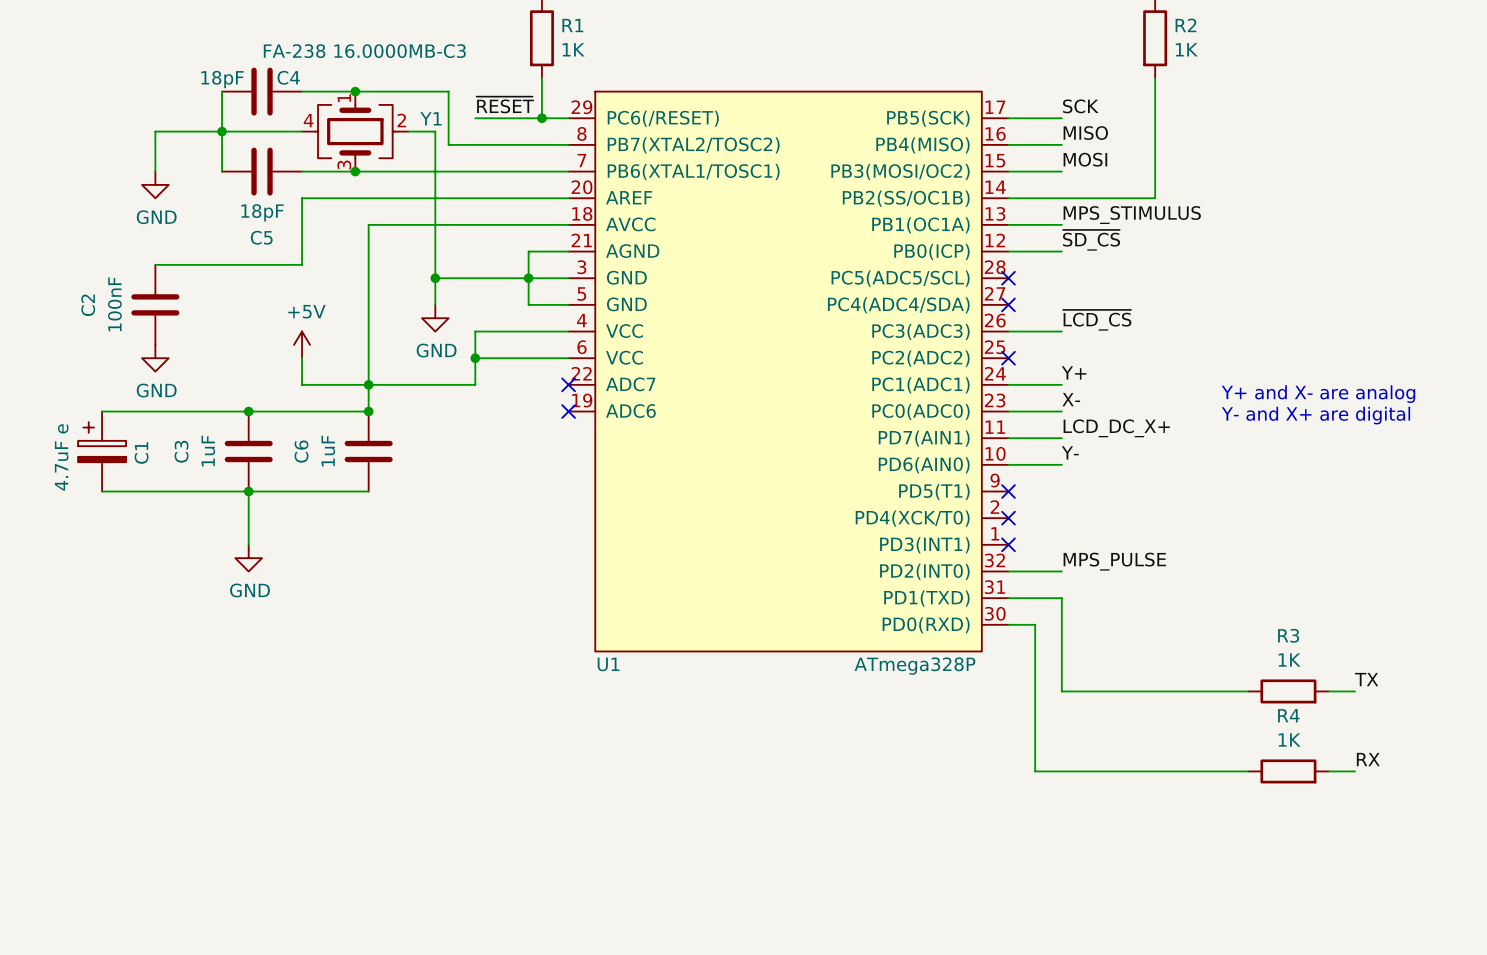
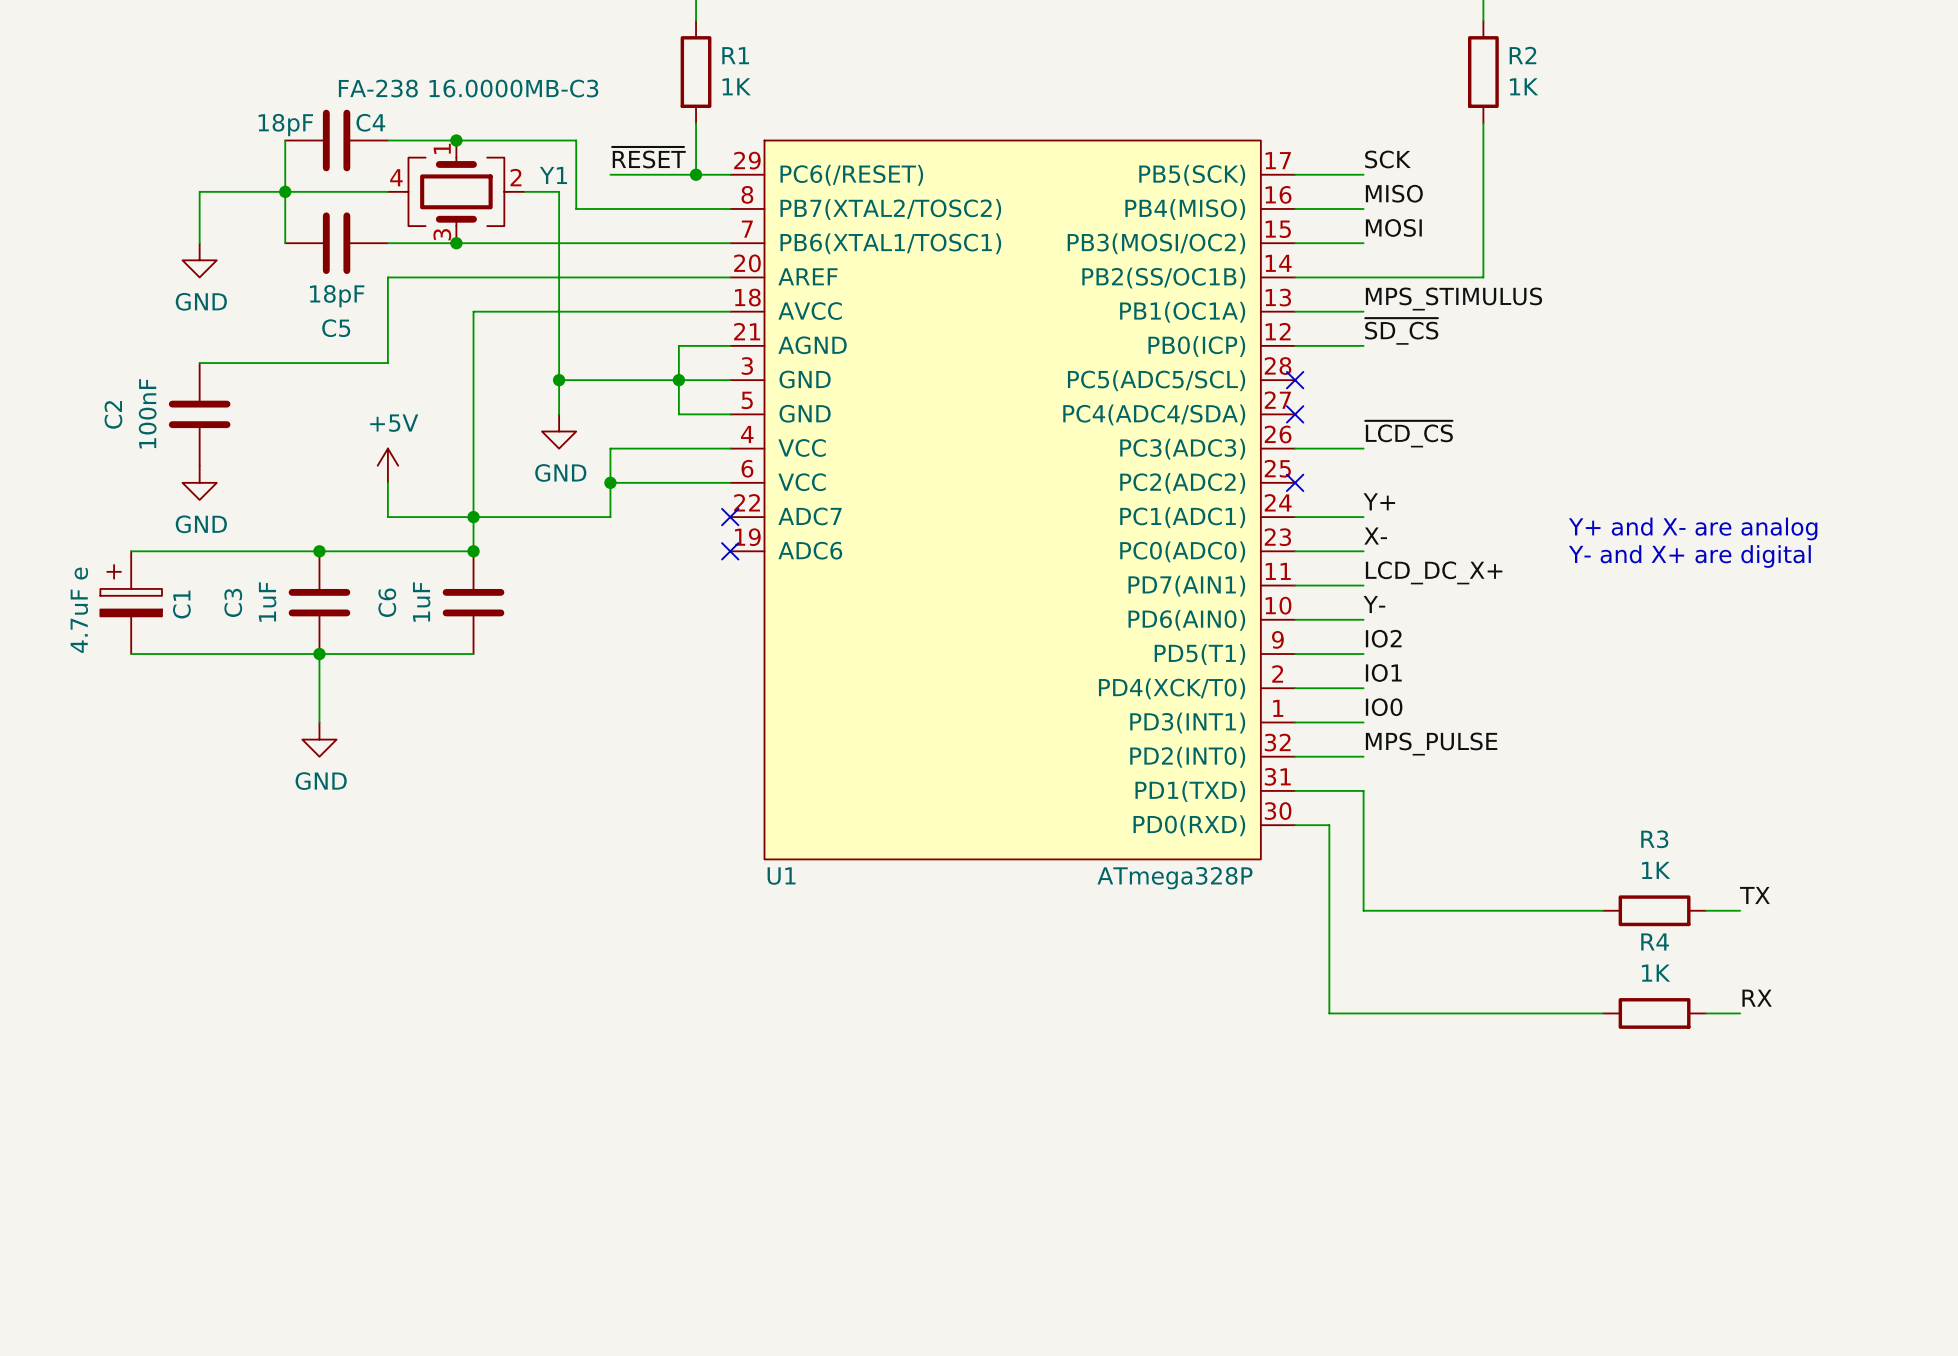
label: none -> IO2 (1383, 638)
wire: none -> (1295, 654) (1363, 654)
no-connect mark: (1008, 491) -> none
label: none -> IO1 (1383, 672)
wire: none -> (1295, 688) (1363, 688)
no-connect mark: (1008, 518) -> none
label: none -> IO0 (1384, 707)
wire: none -> (1295, 722) (1363, 722)
no-connect mark: (1008, 544) -> none

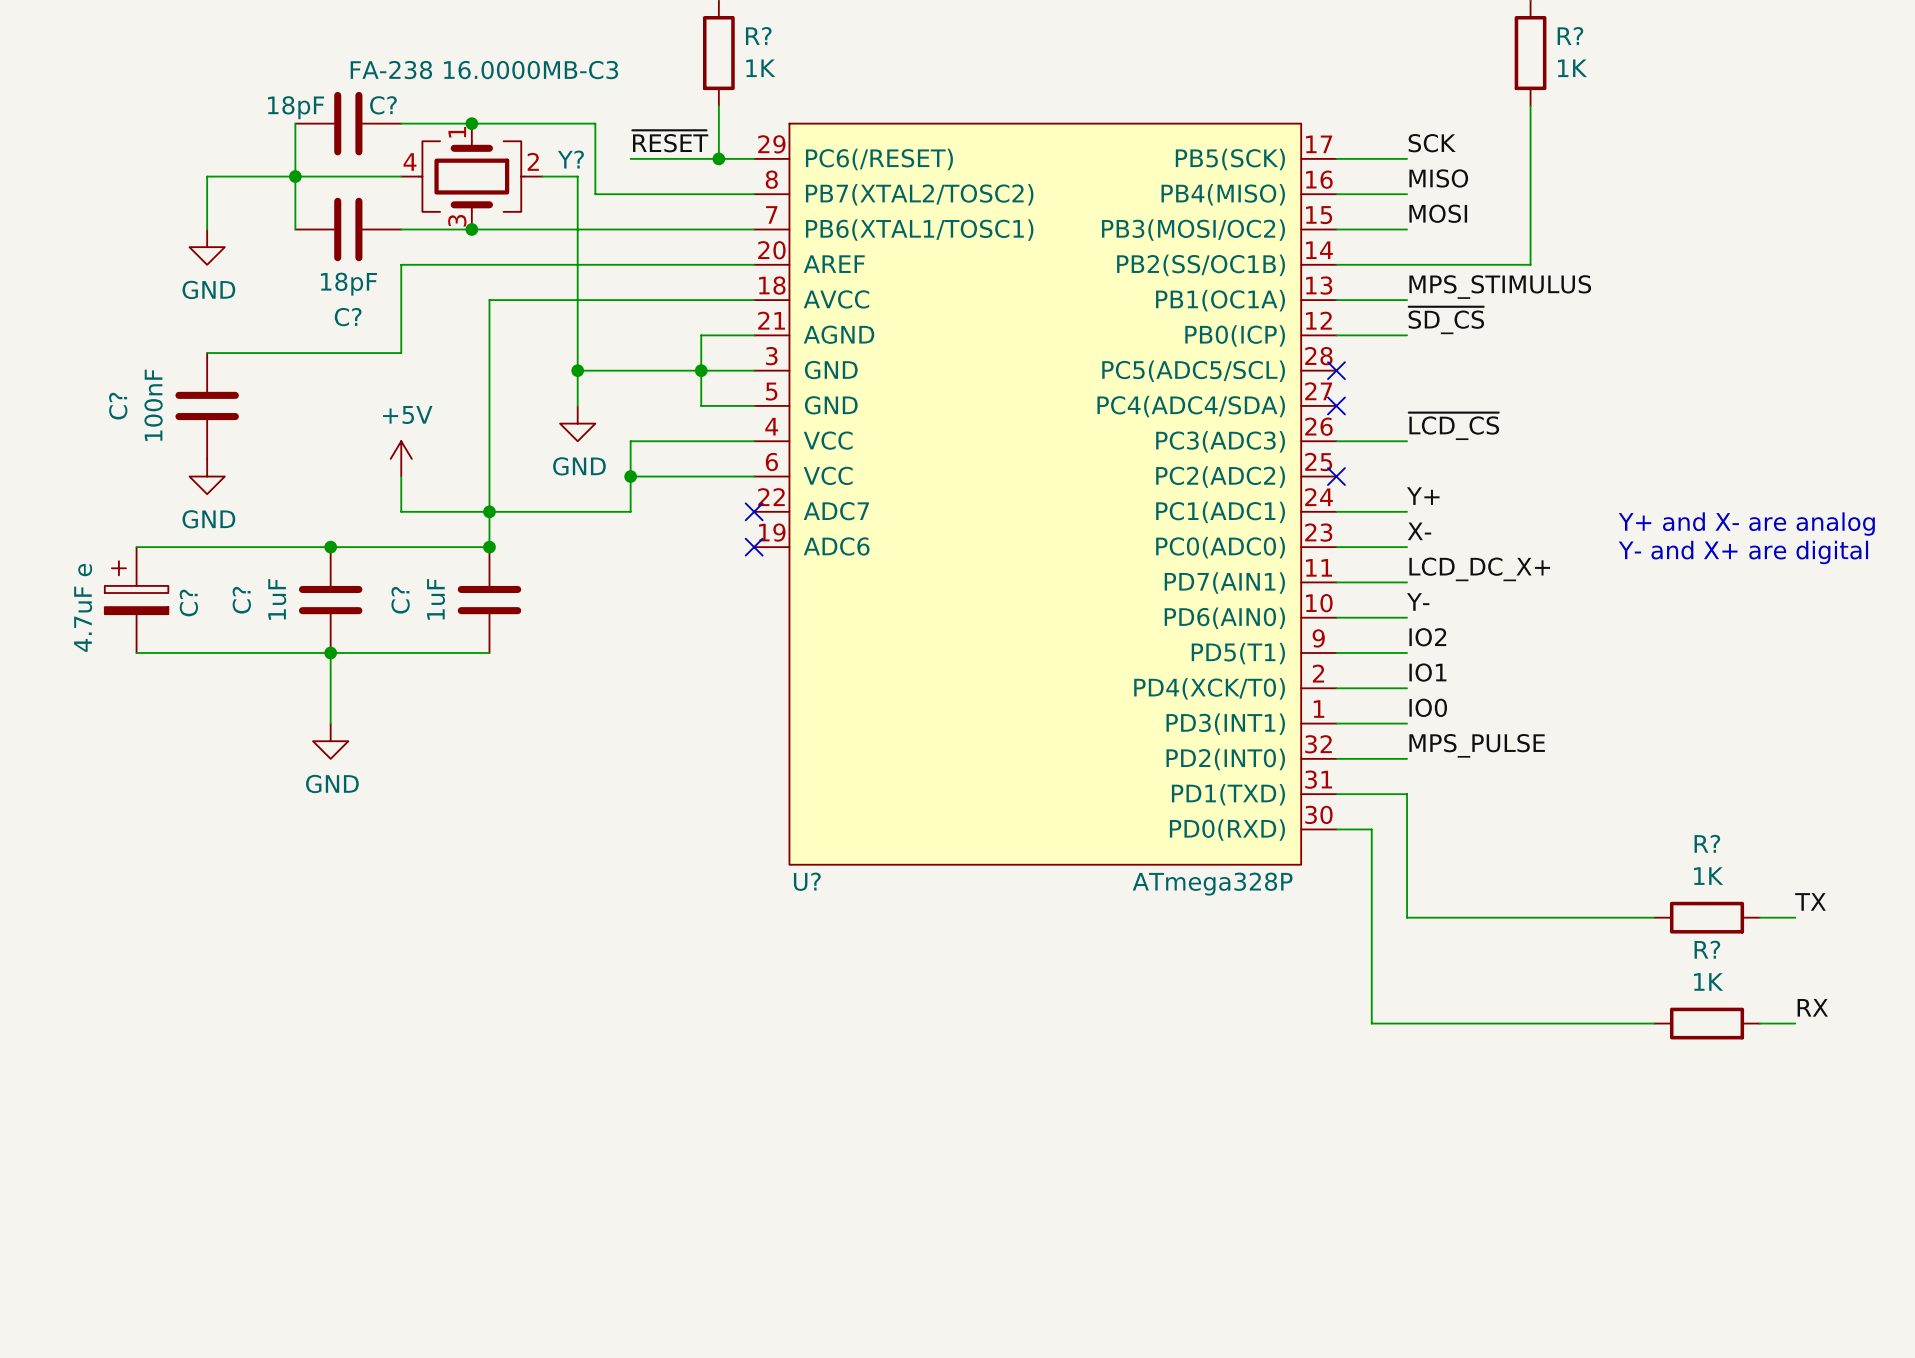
R1 name: R1 (735, 55) -> R? (758, 36)
R2 name: R2 (1522, 55) -> R? (1570, 36)
C4 name: C4 (370, 122) -> C? (383, 105)
Y1 name: Y1 (553, 175) -> Y? (570, 159)
C5 name: C5 (336, 328) -> C? (348, 317)
C2 name: C2 (113, 414) -> C? (118, 406)
C3 name: C3 (233, 602) -> C? (241, 600)
C6 name: C6 (387, 602) -> C? (400, 600)
C1 name: C1 (181, 604) -> C? (188, 603)
R3 name: R3 (1654, 839) -> R? (1707, 843)
U1 name: U1 (781, 876) -> U? (807, 881)
R4 name: R4 (1655, 941) -> R? (1707, 949)

